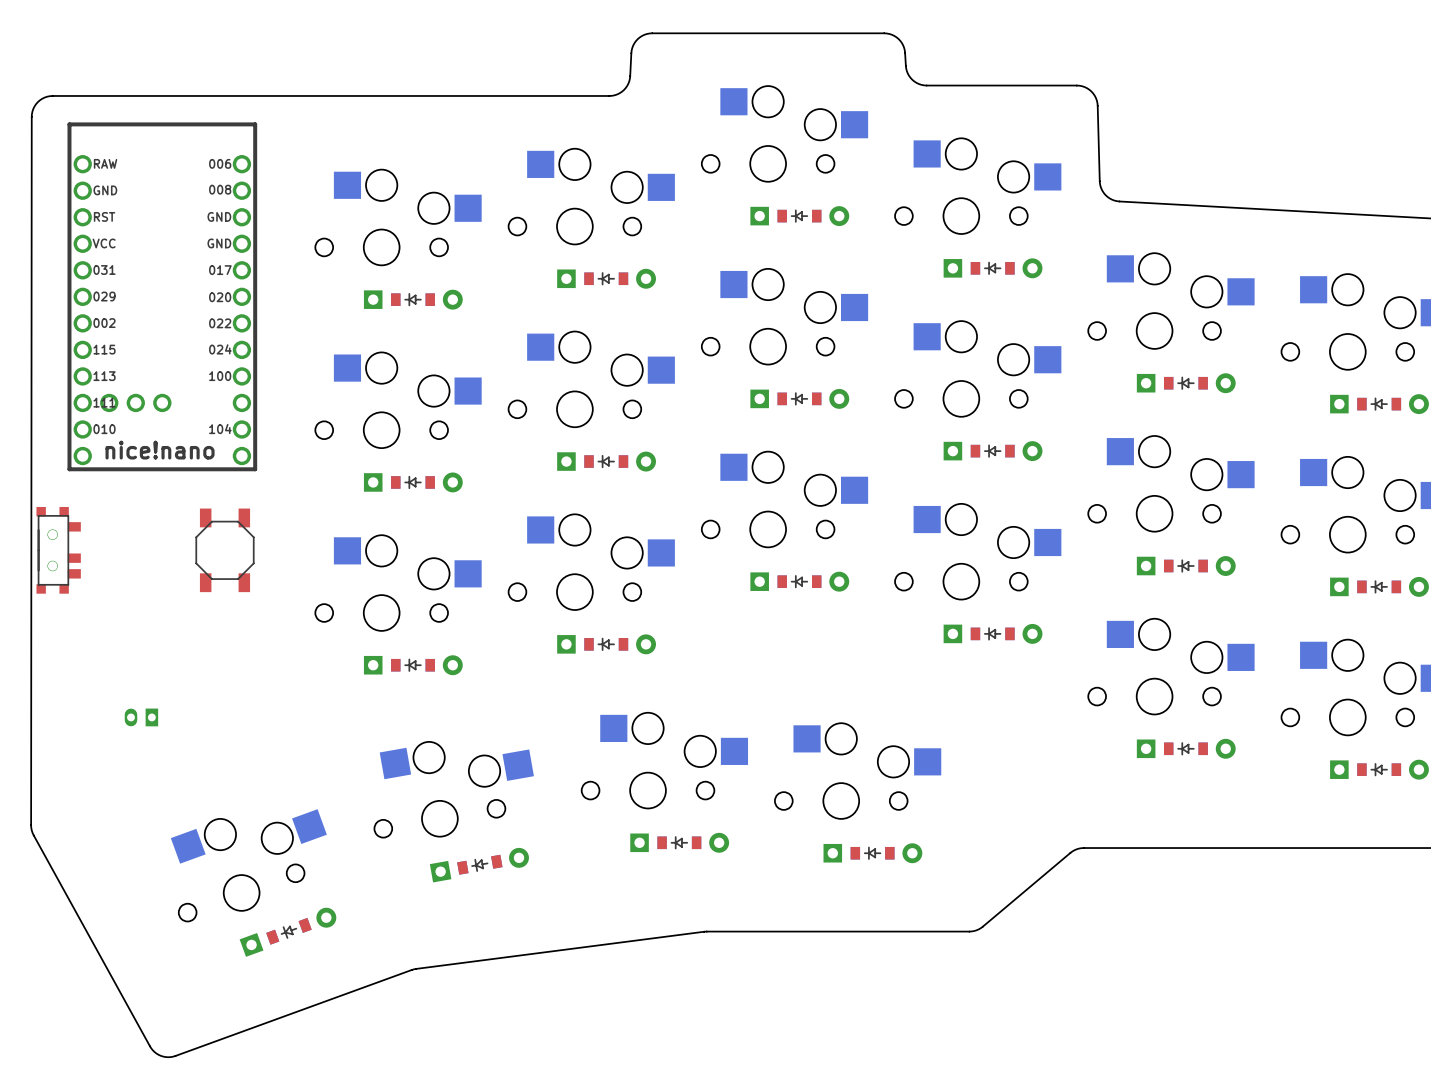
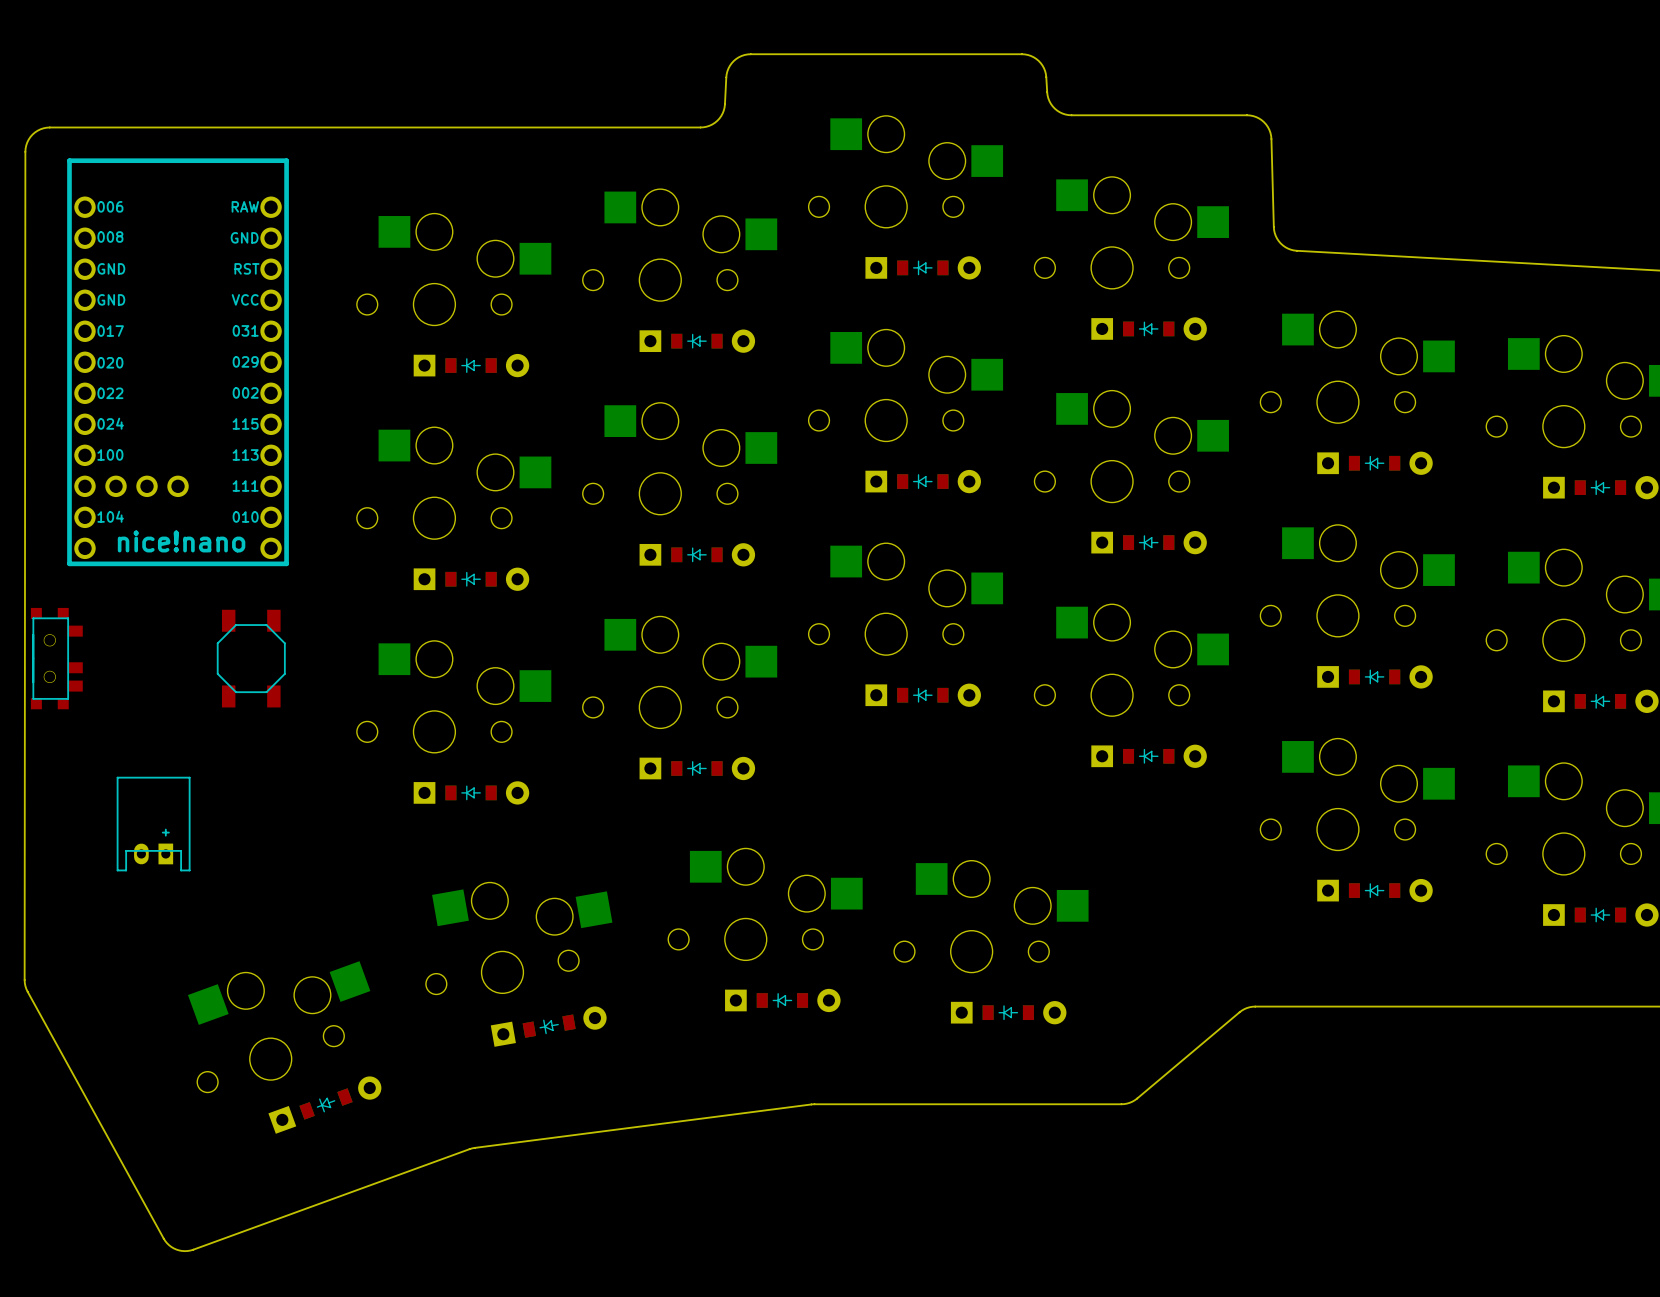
part footprint: [67, 122, 258, 472] -> [67, 158, 289, 567]
part: none -> (153, 824)
part: (141, 717) -> none

